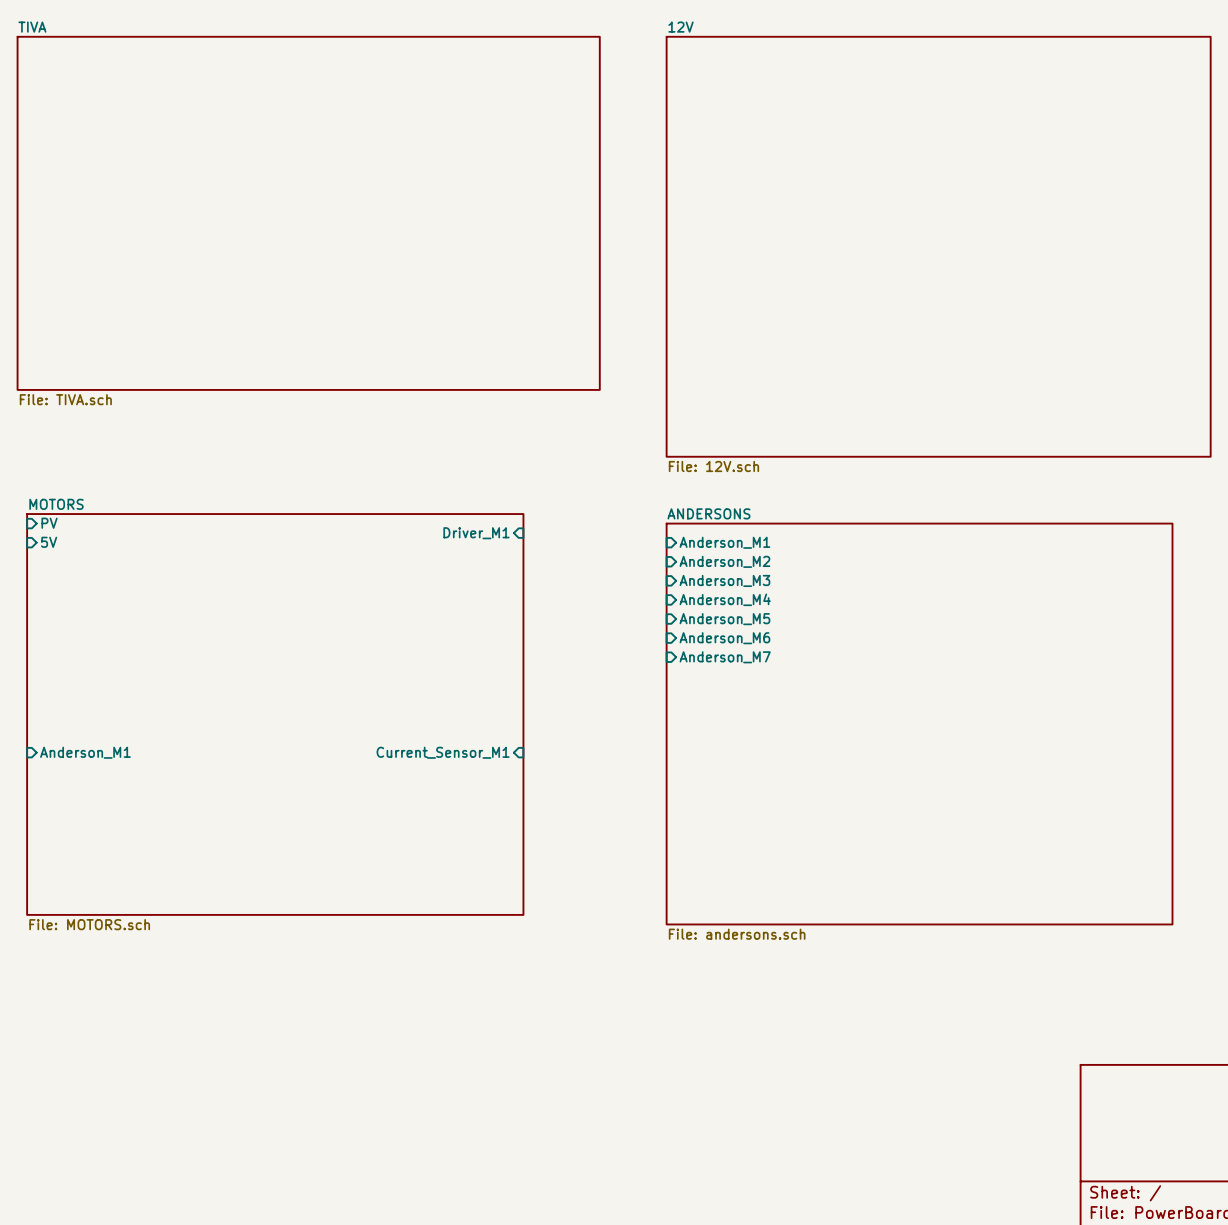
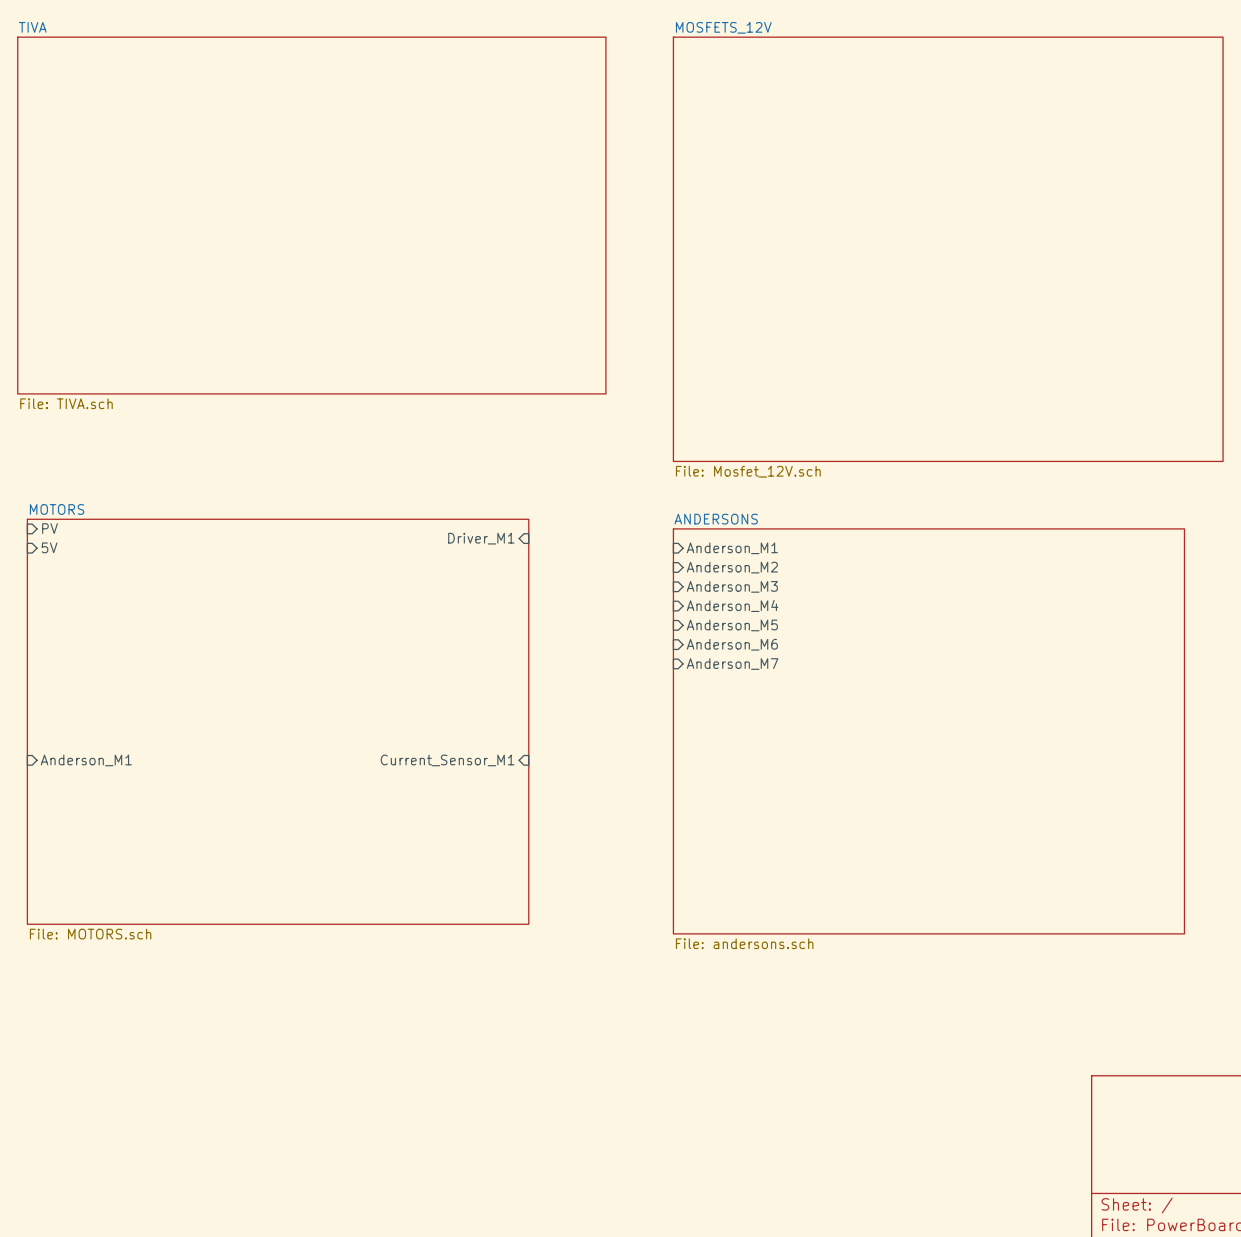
sheet 12V name: 12V (681, 27) -> MOSFETS_12V (723, 27)
sheet 12V value: File: 12V.sch (713, 466) -> File: Mosfet_12V.sch (748, 471)

